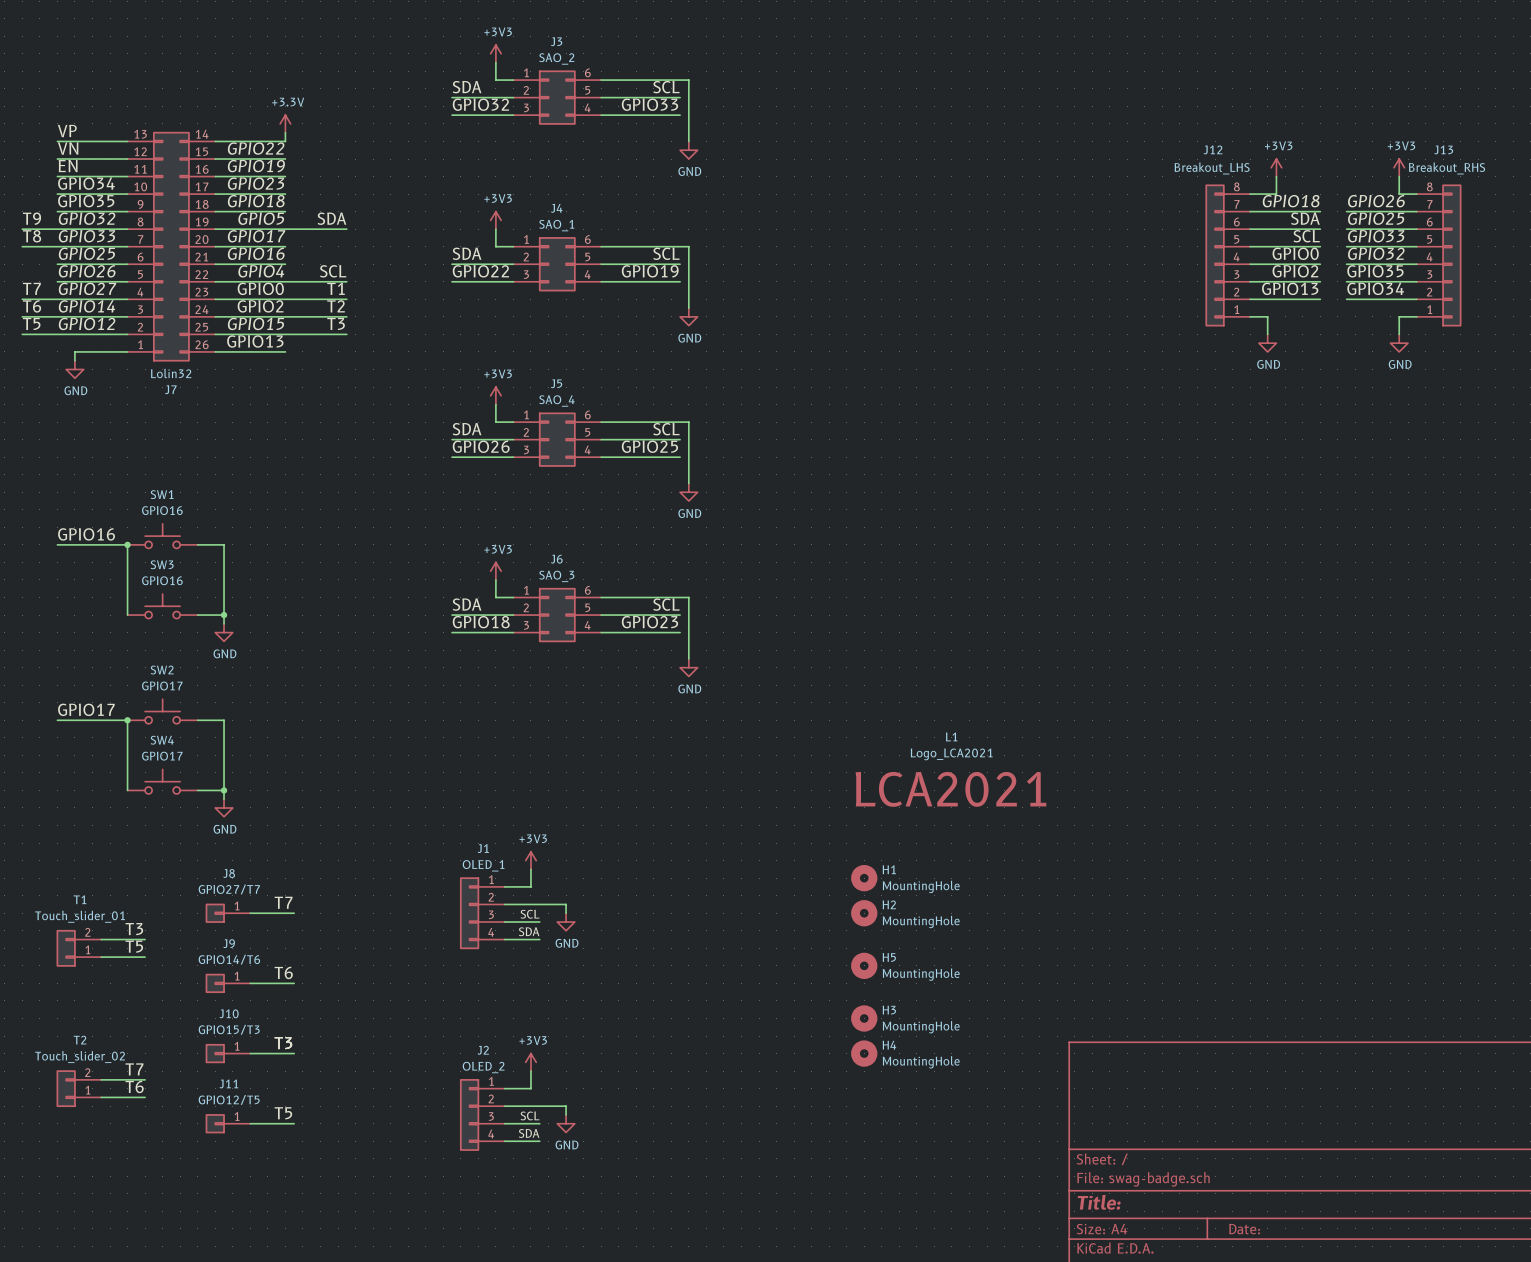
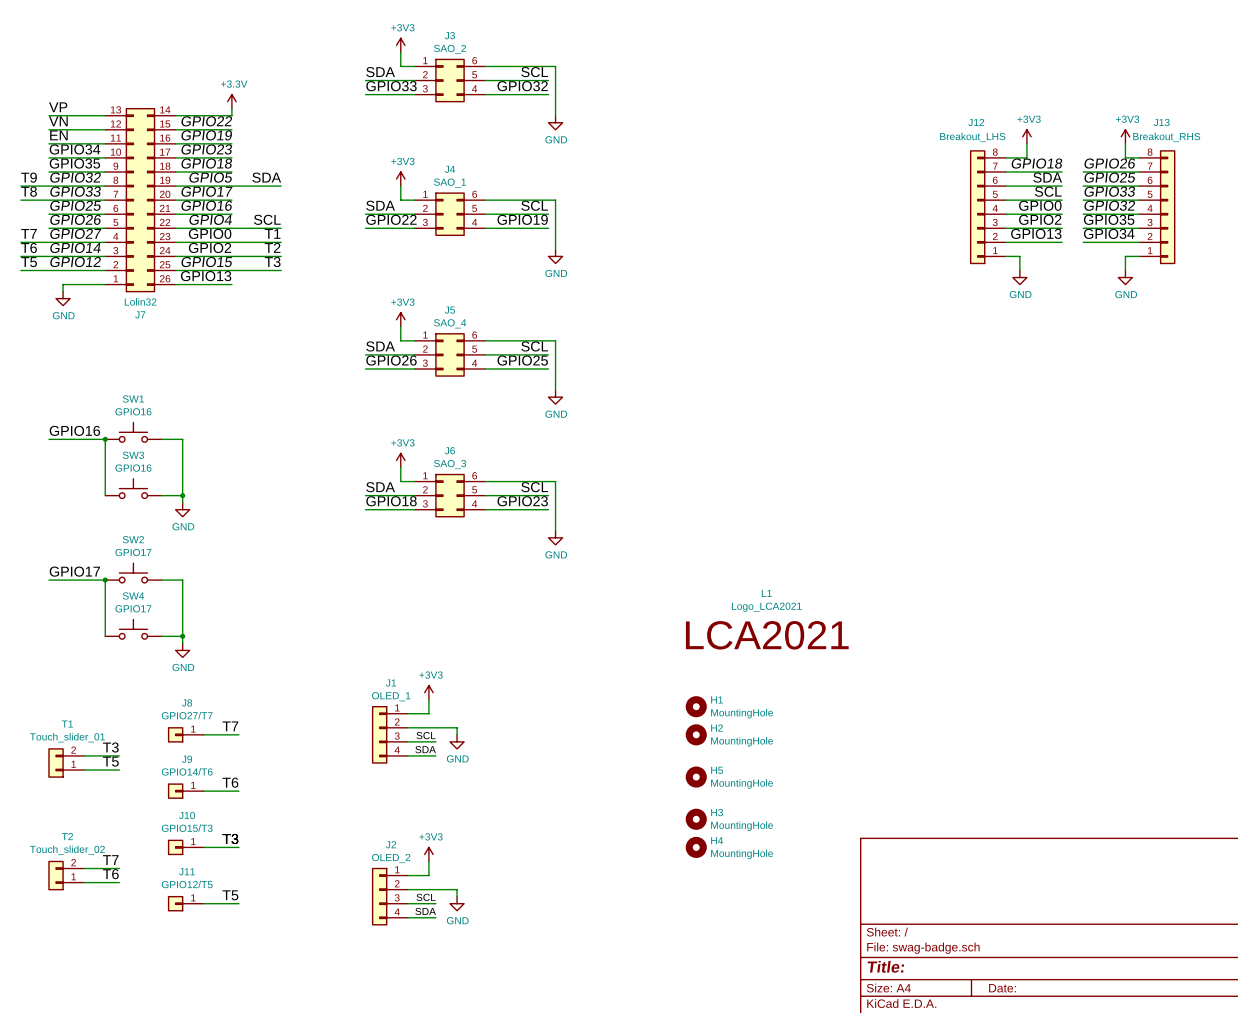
label: GPIO32 (480, 104) -> GPIO33 (391, 86)
label: GPIO33 (649, 104) -> GPIO32 (522, 86)

